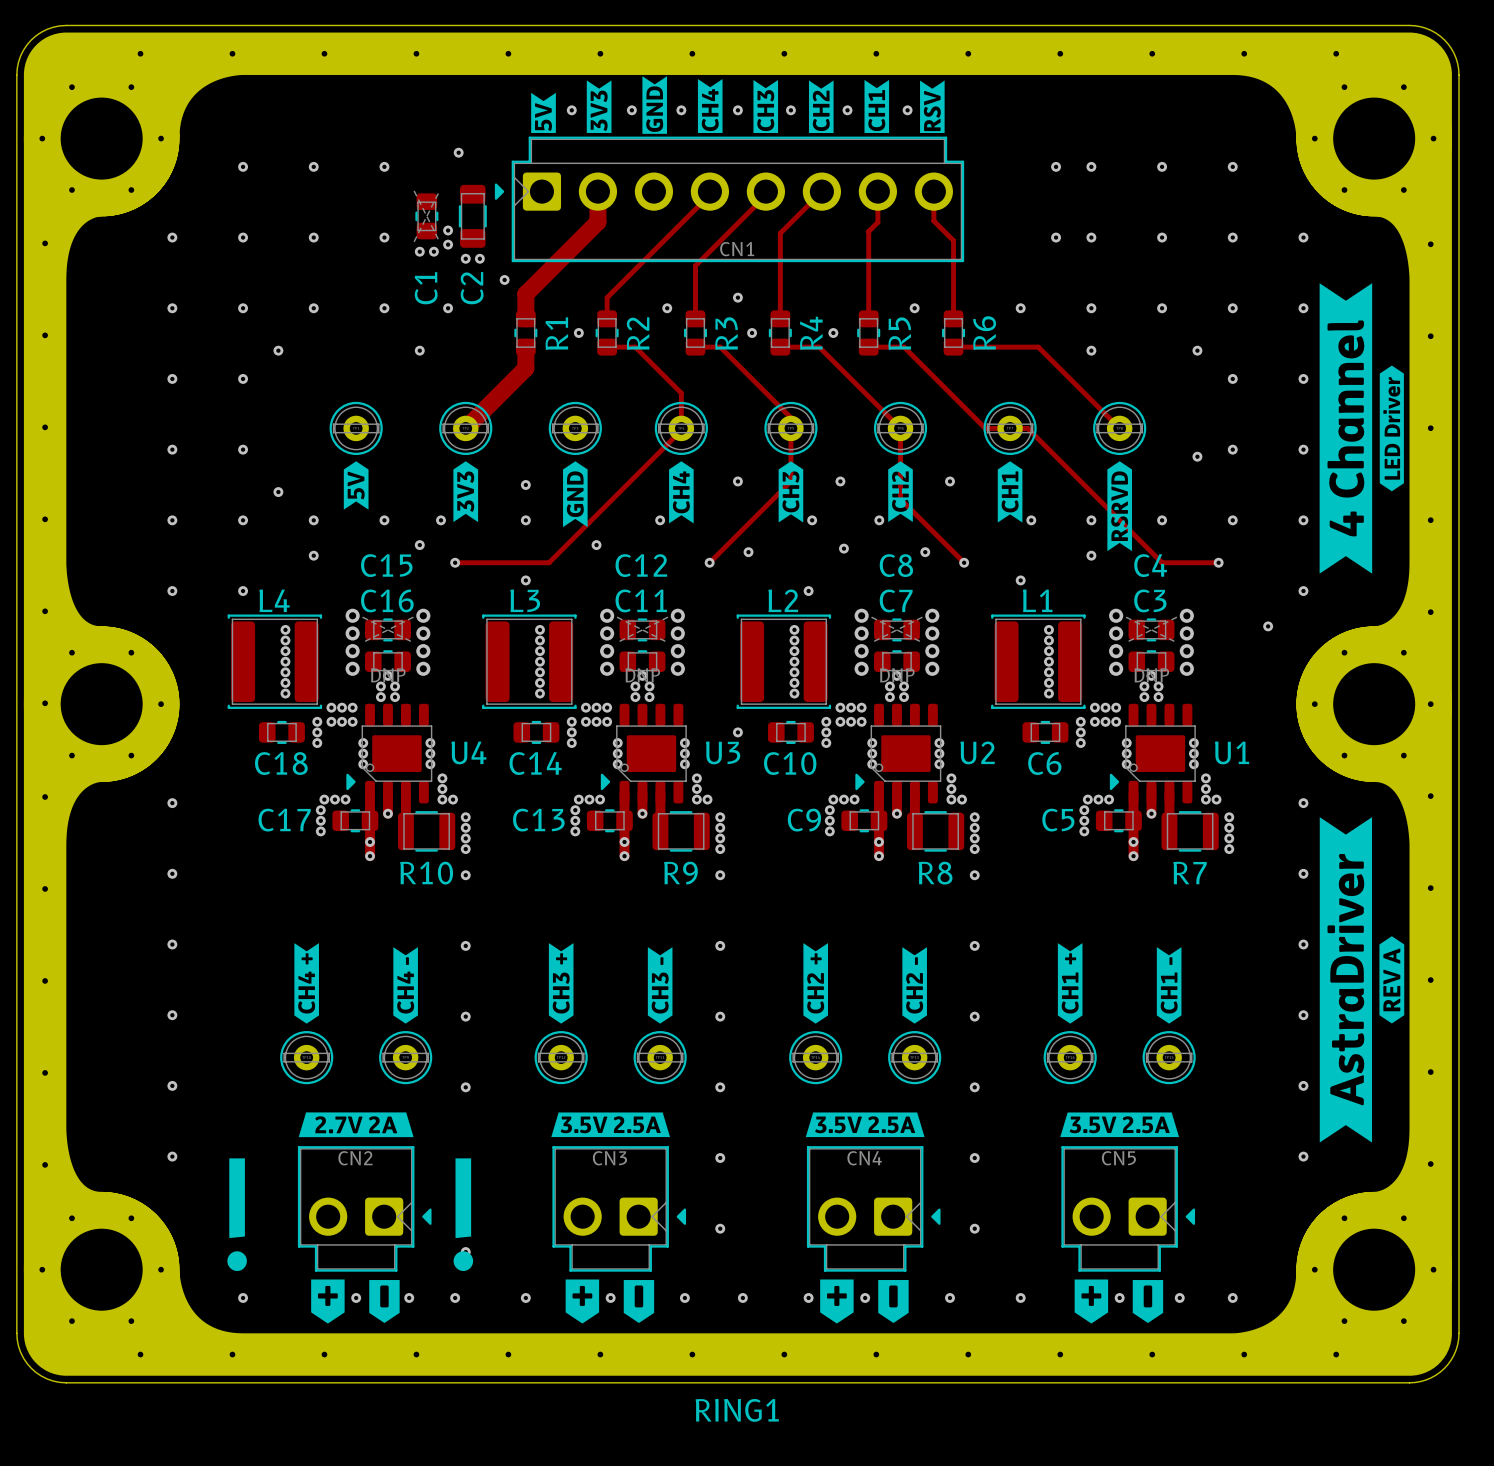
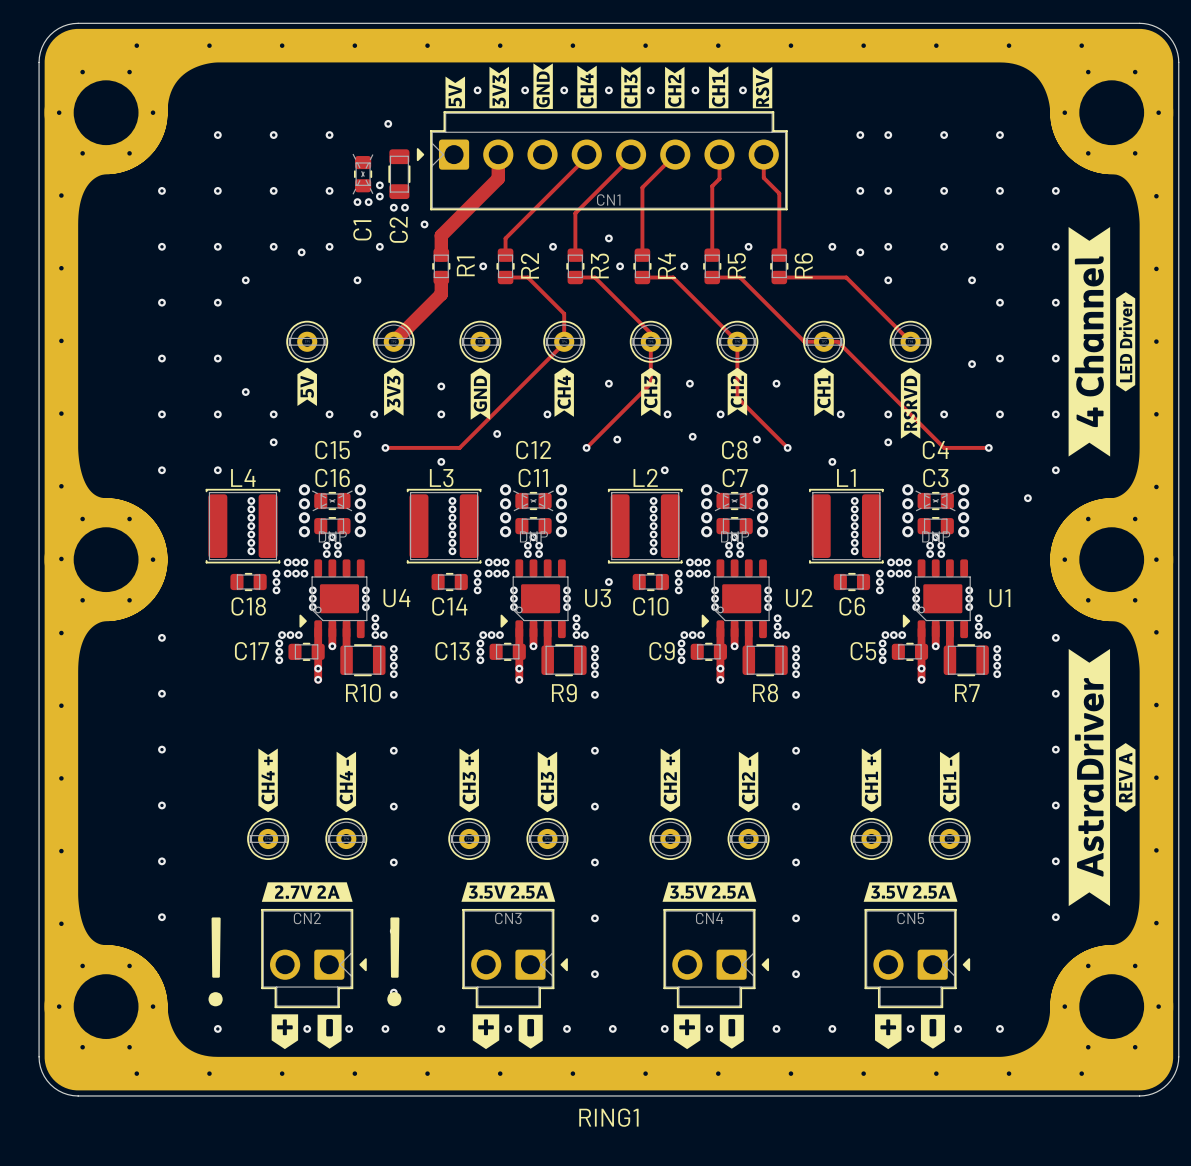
via: none -> (301, 252)
via: none -> (860, 252)

